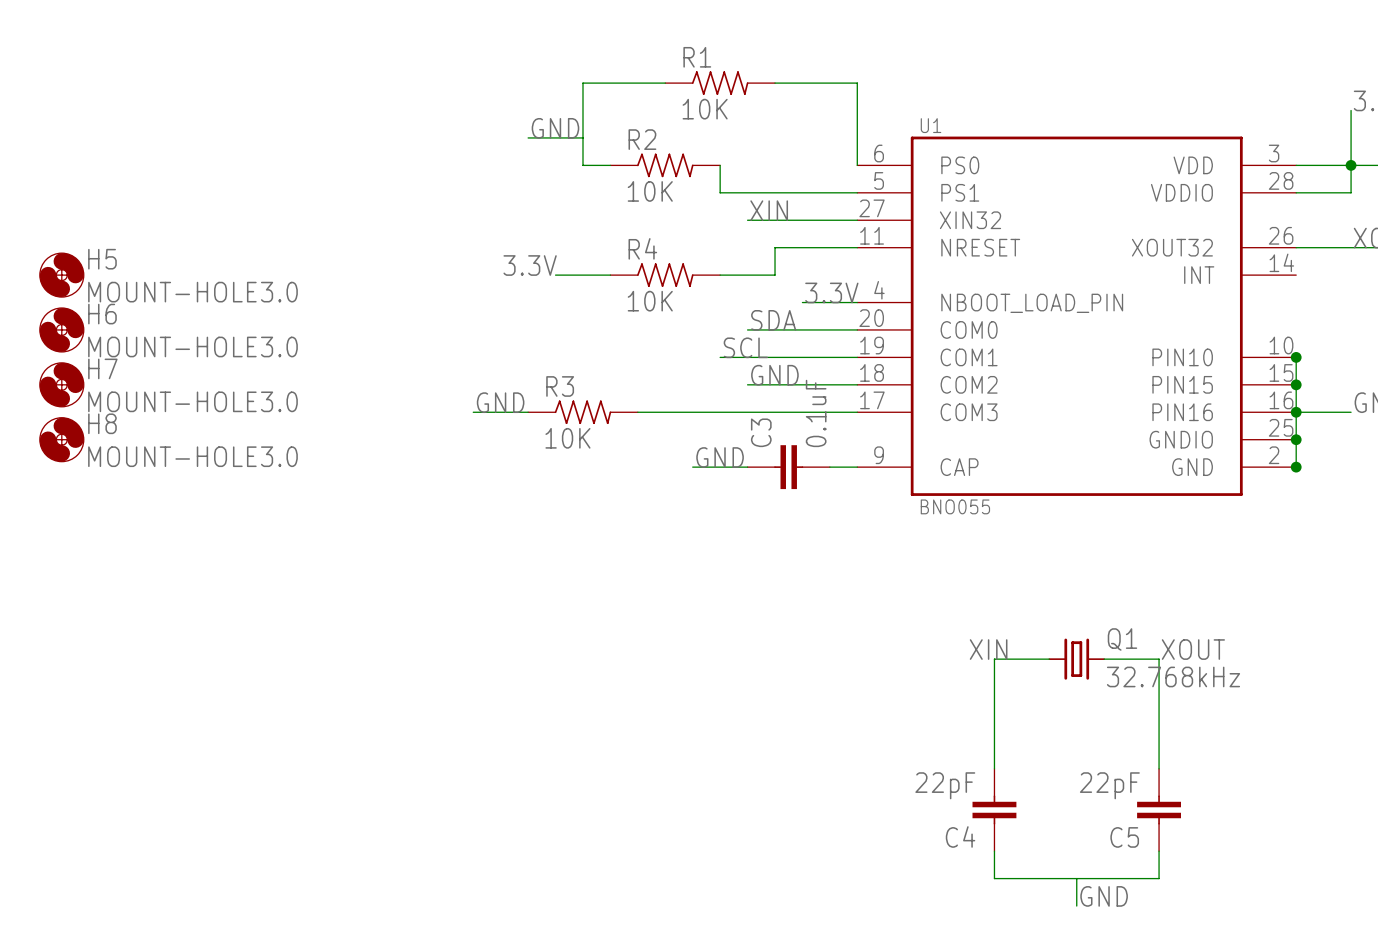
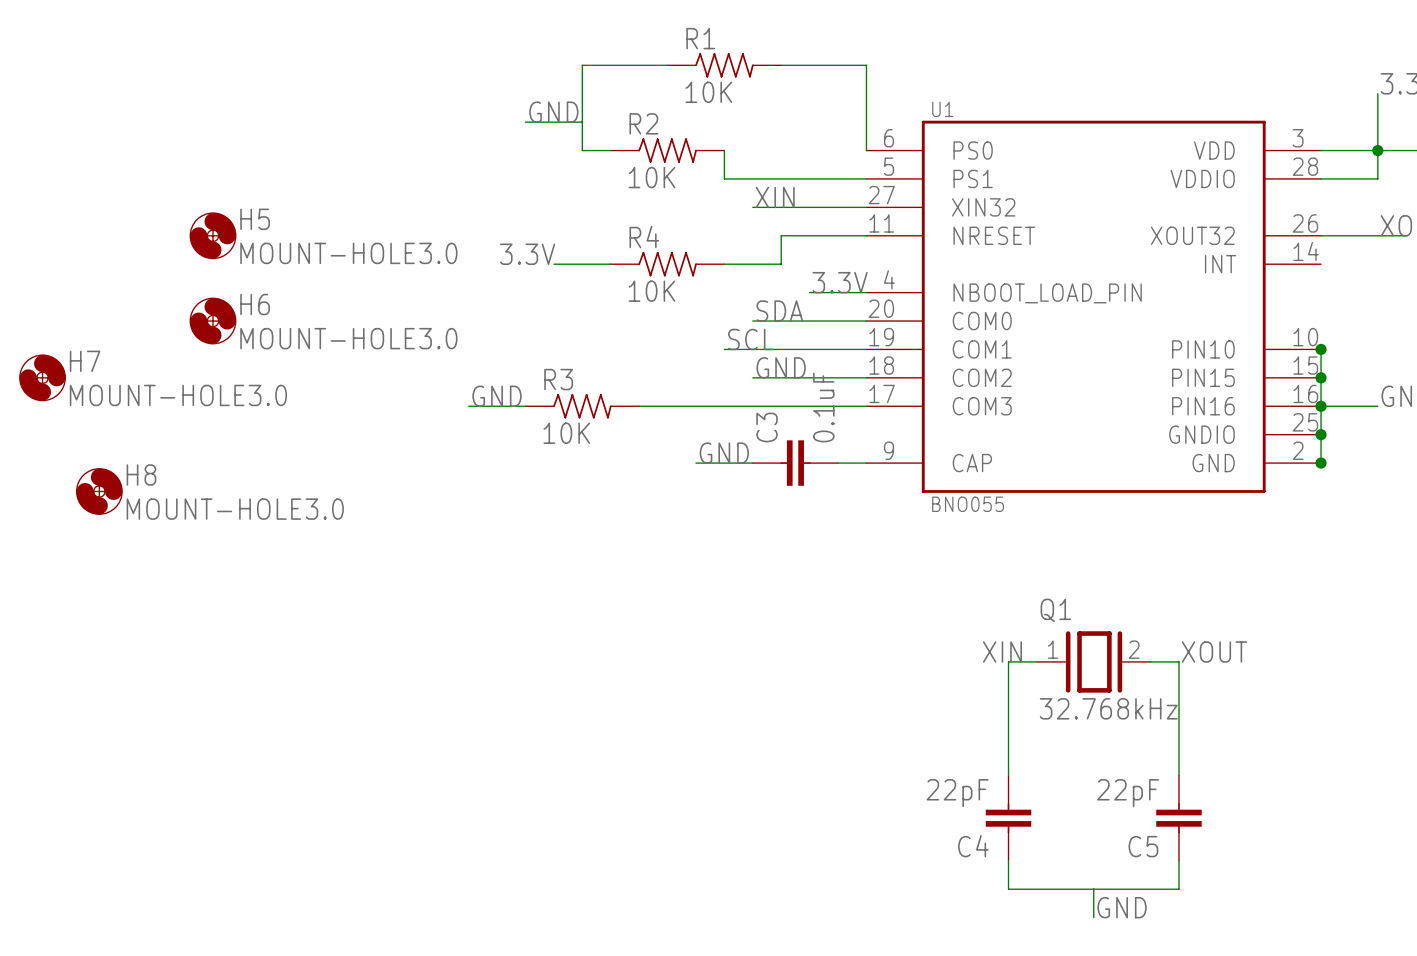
H5 position: (61, 275) -> (213, 235)
H6 position: (61, 329) -> (213, 321)
H8 position: (61, 439) -> (99, 491)
Q1 symbol: [1048, 638, 1106, 680] -> [1036, 631, 1151, 693]
Q1 name position: Q1 (1122, 639) -> Q1 (1055, 610)
Q1 value position: 32.768kHz (1173, 676) -> 32.768kHz (1108, 708)

